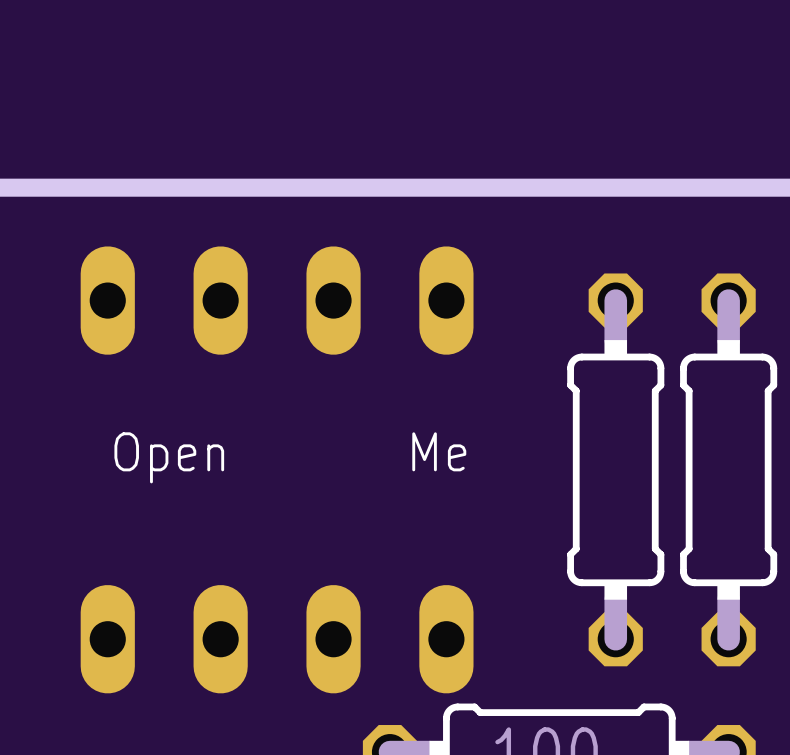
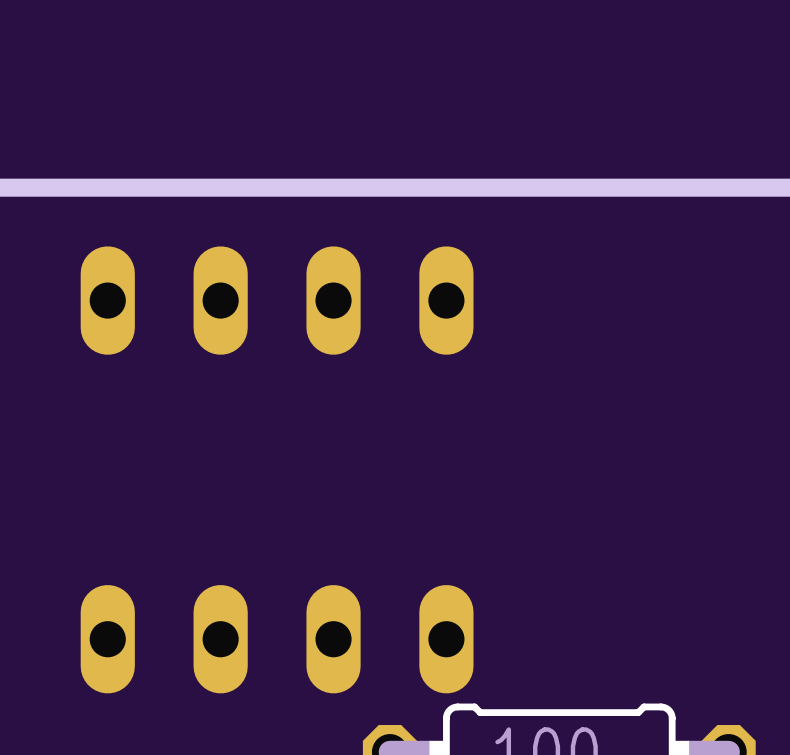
text: Me (439, 451) -> none
text: Open (169, 457) -> none
part: (615, 469) -> none
part: (728, 469) -> none

